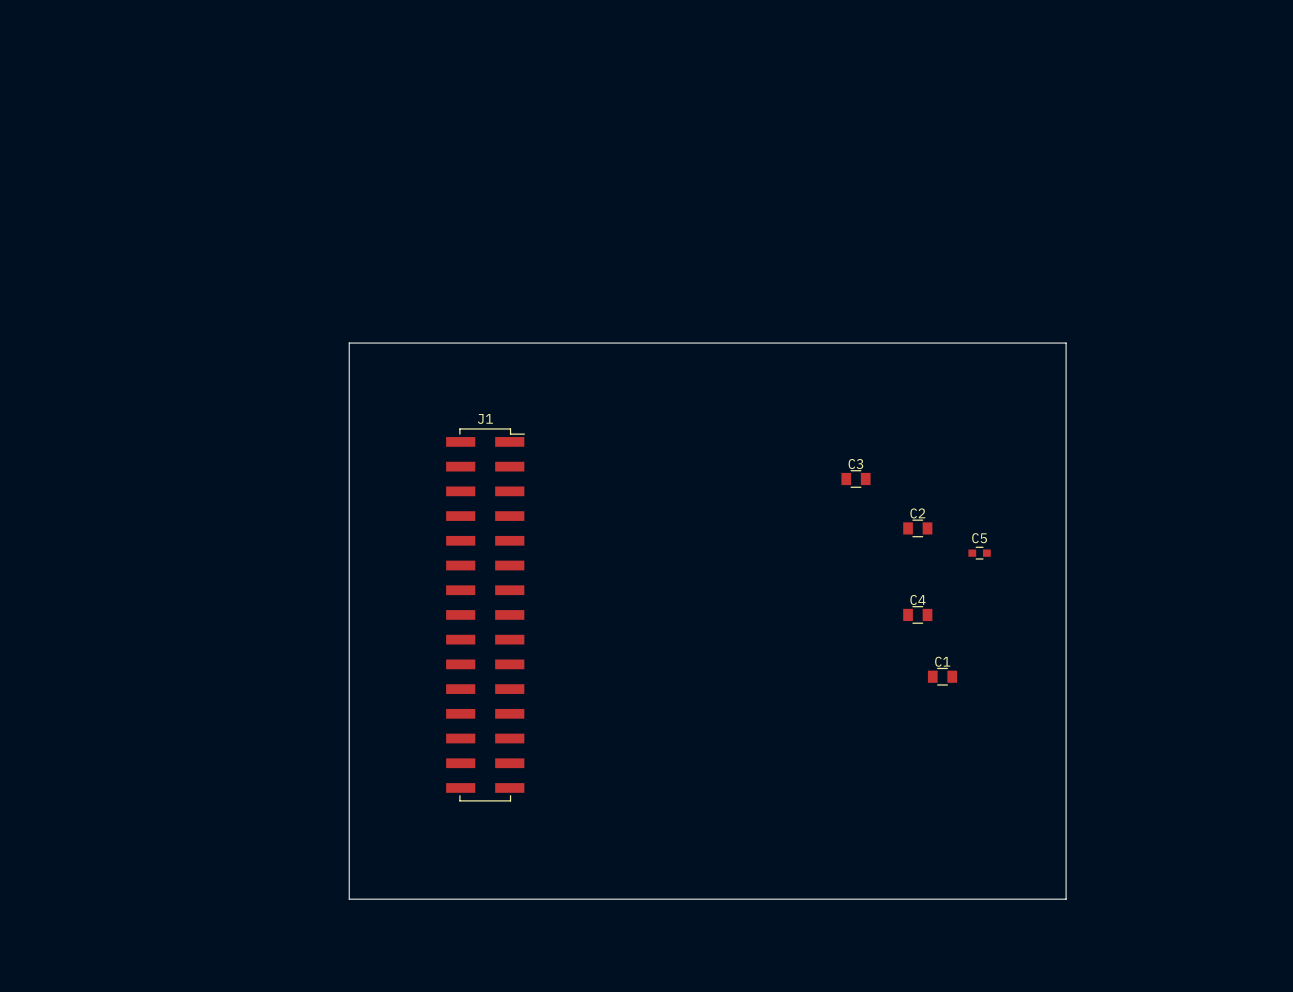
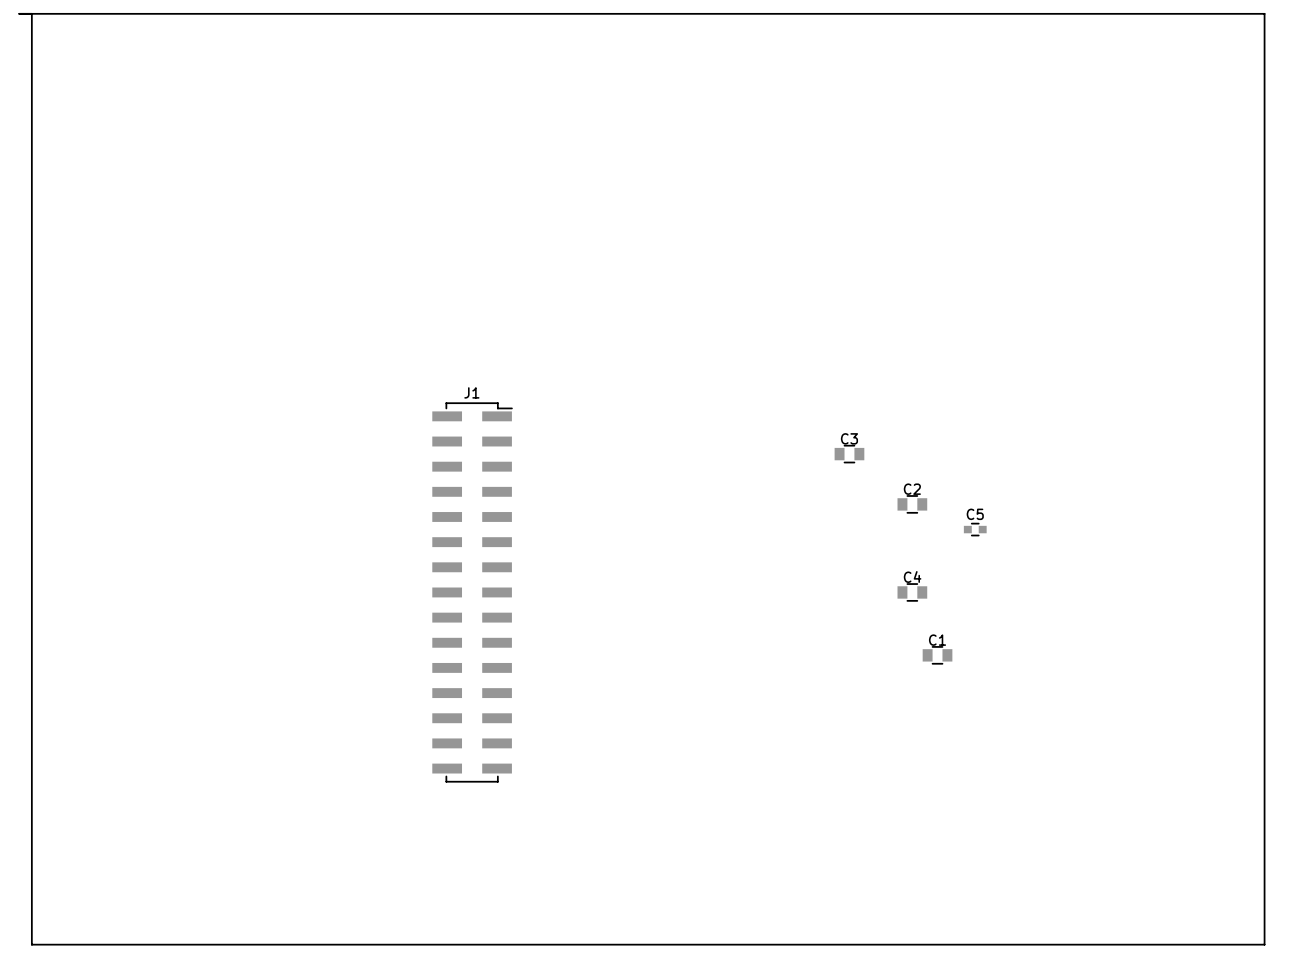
board edge: none -> (19, 13) (1264, 13) (1264, 944) (31, 944) (31, 13)
board edge: (349, 343) (349, 899) (1066, 899) (1066, 343) (349, 343) -> none

